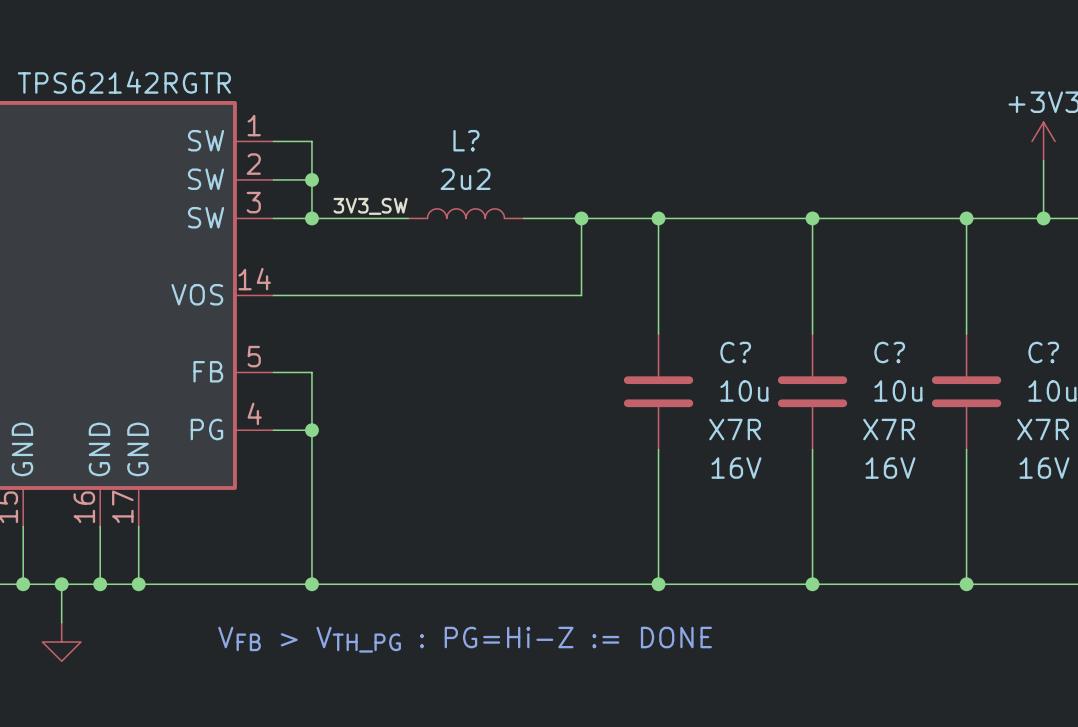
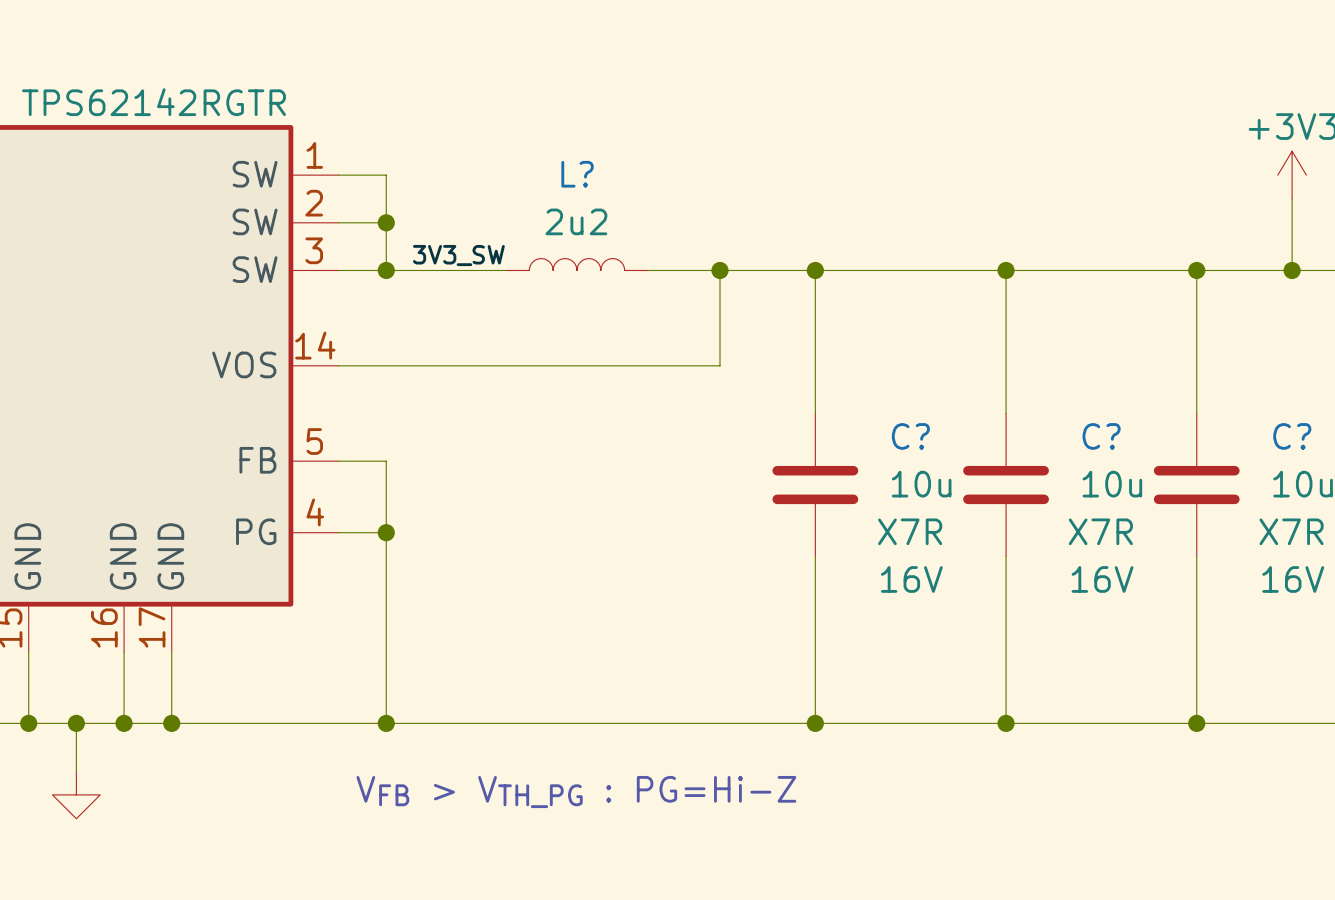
text: VFB > VTH_PG : PG=Hi-Z := DONE (465, 639) -> VFB > VTH_PG : PG=Hi-Z (576, 792)

